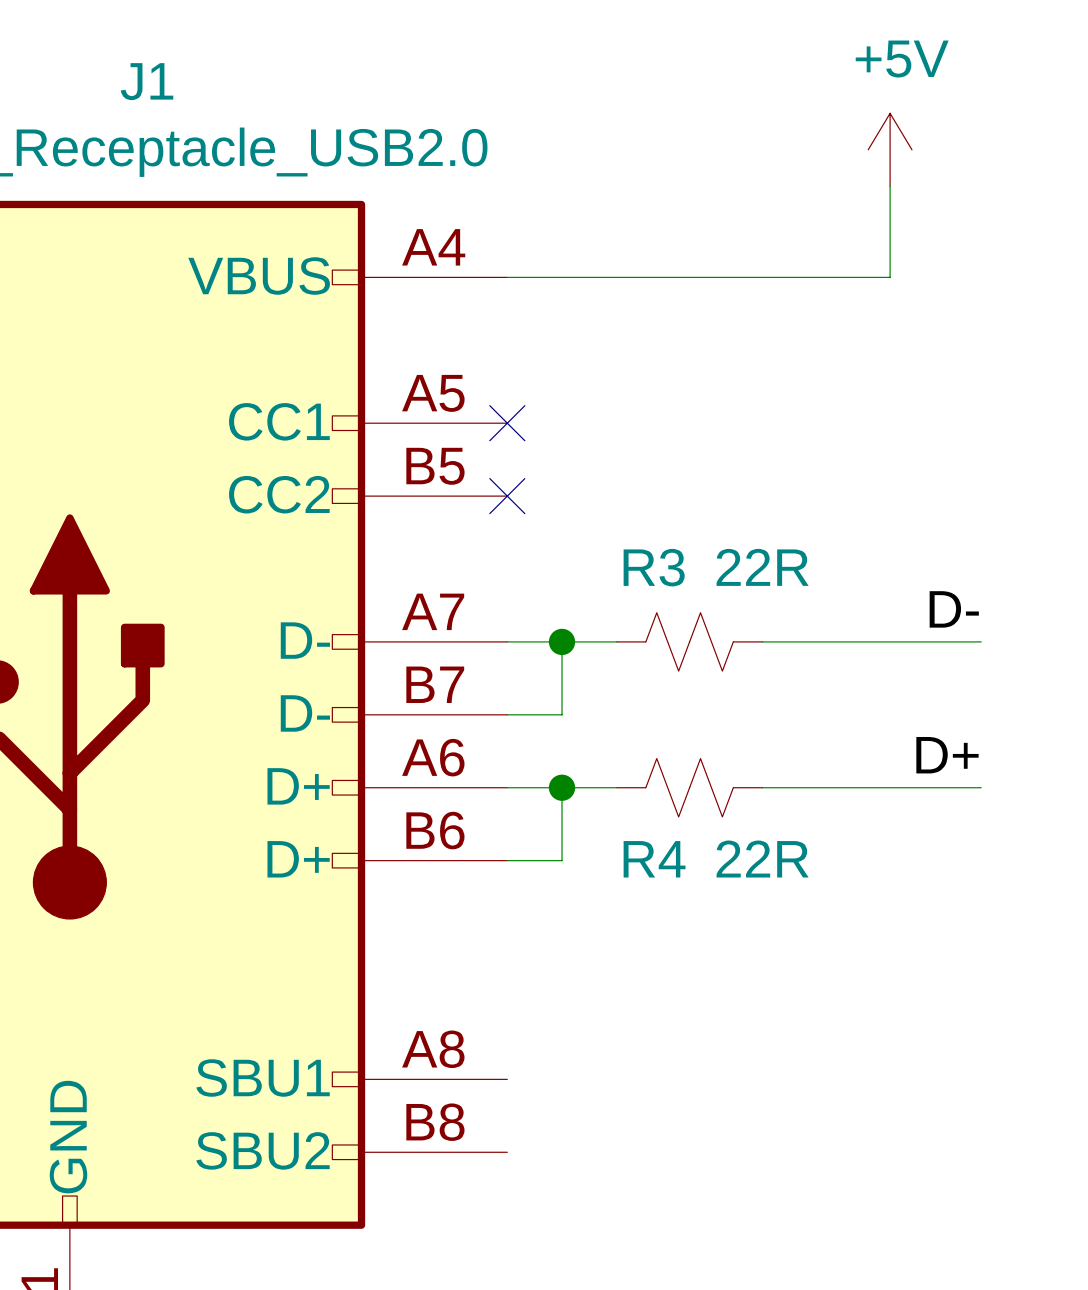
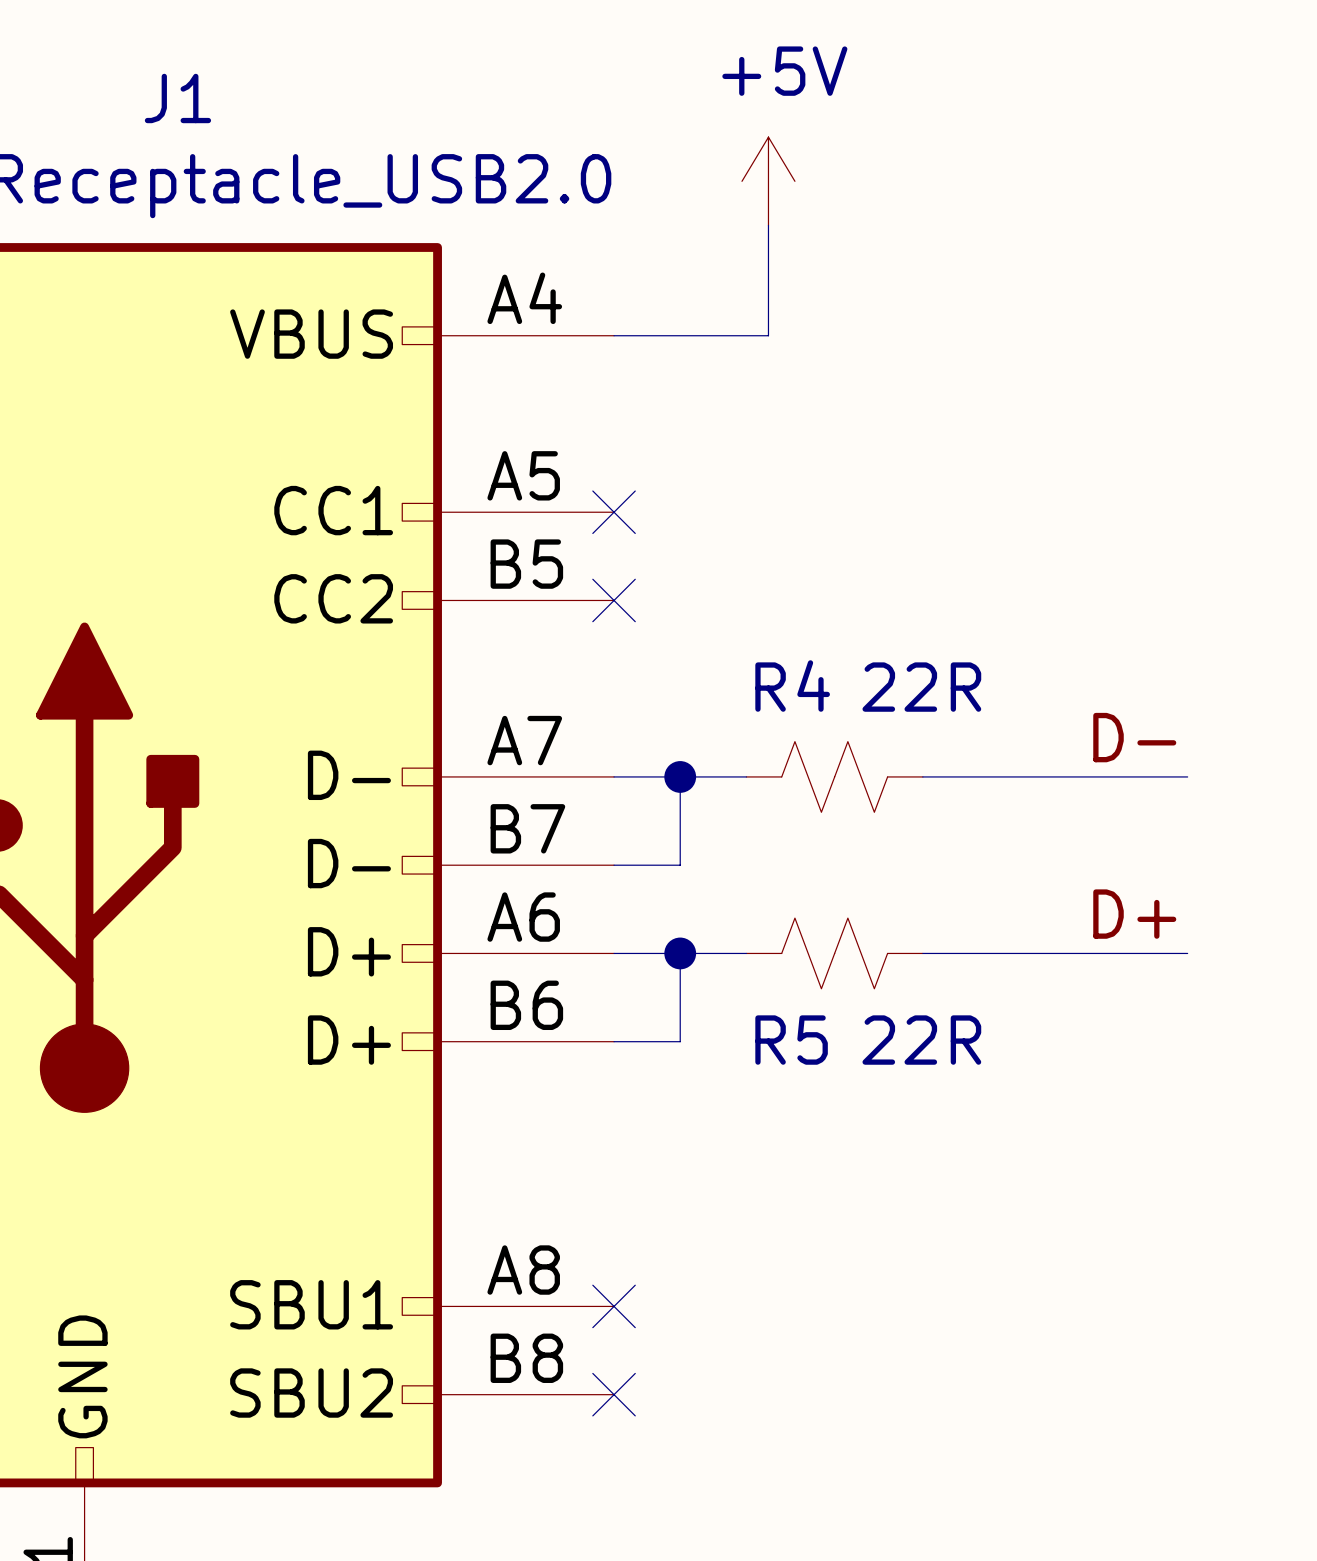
power symbol position: +5V (890, 149) -> +5V (768, 181)
wire: (890, 186) (890, 277) (634, 277) -> (768, 225) (768, 335)
R3 name: R3 (654, 567) -> R4 (792, 686)
R4 name: R4 (654, 859) -> R5 (791, 1040)
no-connect mark: none -> (614, 1306)
no-connect mark: none -> (614, 1394)

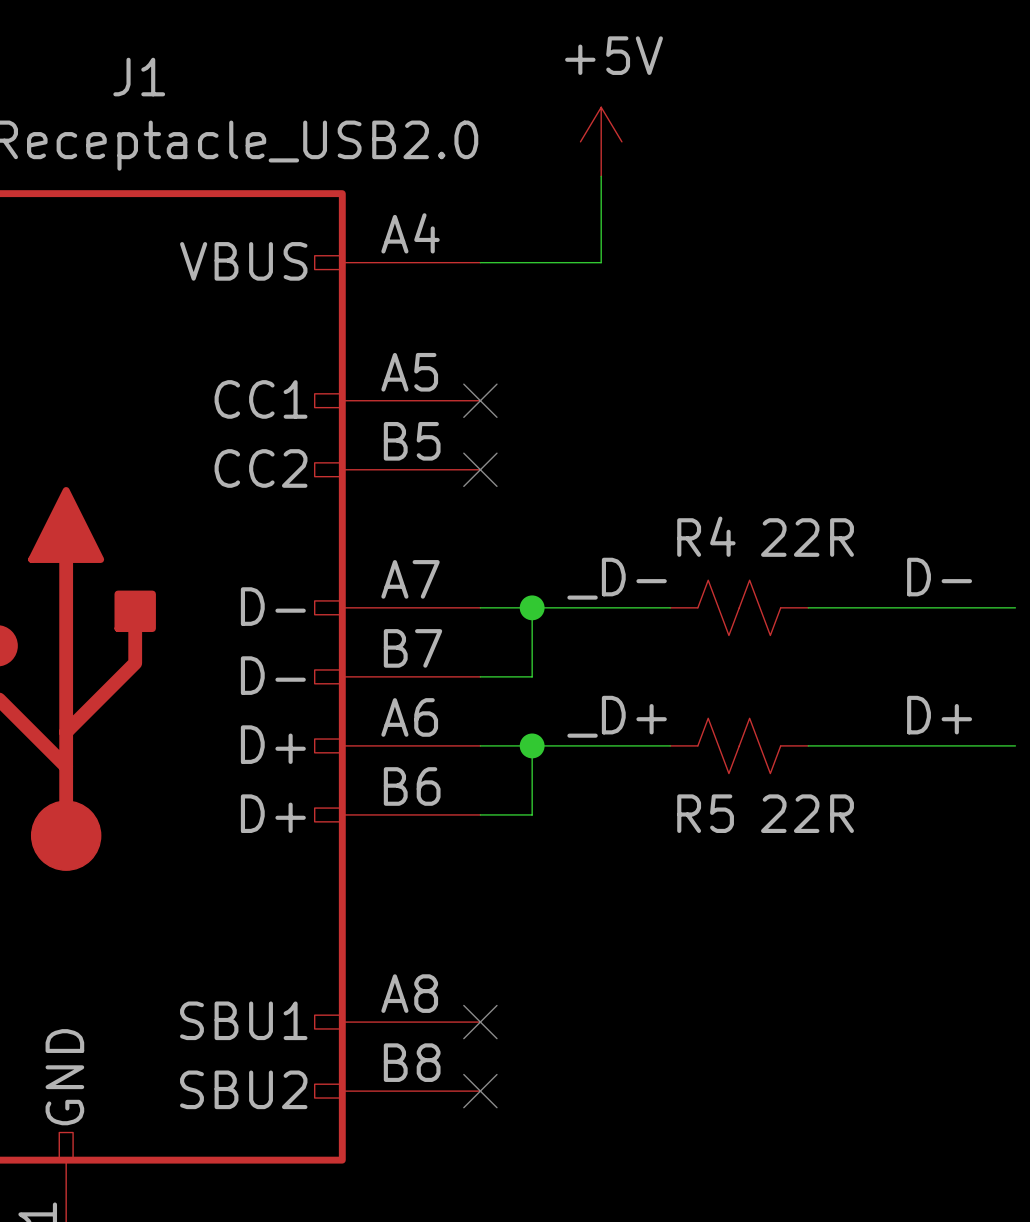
label position: D- (1134, 737) -> D- (939, 577)
label: none -> _D- (617, 578)
R4 position: (834, 776) -> (739, 607)
wire: (922, 776) (1033, 776) -> (583, 607) (670, 607)
wire: none -> (929, 607) (1015, 607)
label position: D+ (1134, 914) -> D+ (939, 715)
label: none -> _D+ (617, 716)
R5 position: (834, 953) -> (739, 745)
wire: (922, 953) (1033, 953) -> (583, 745) (670, 745)
wire: none -> (929, 745) (1015, 745)

